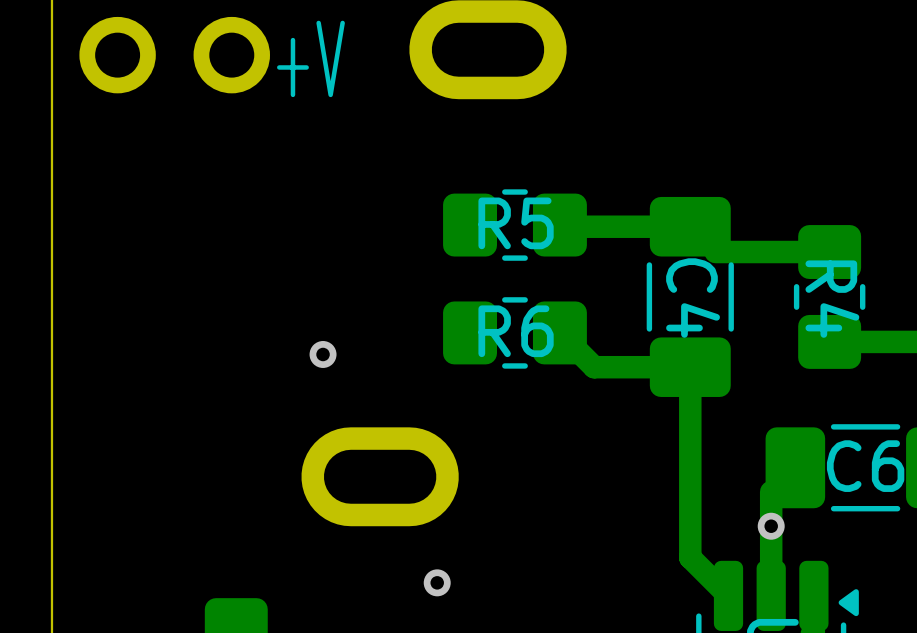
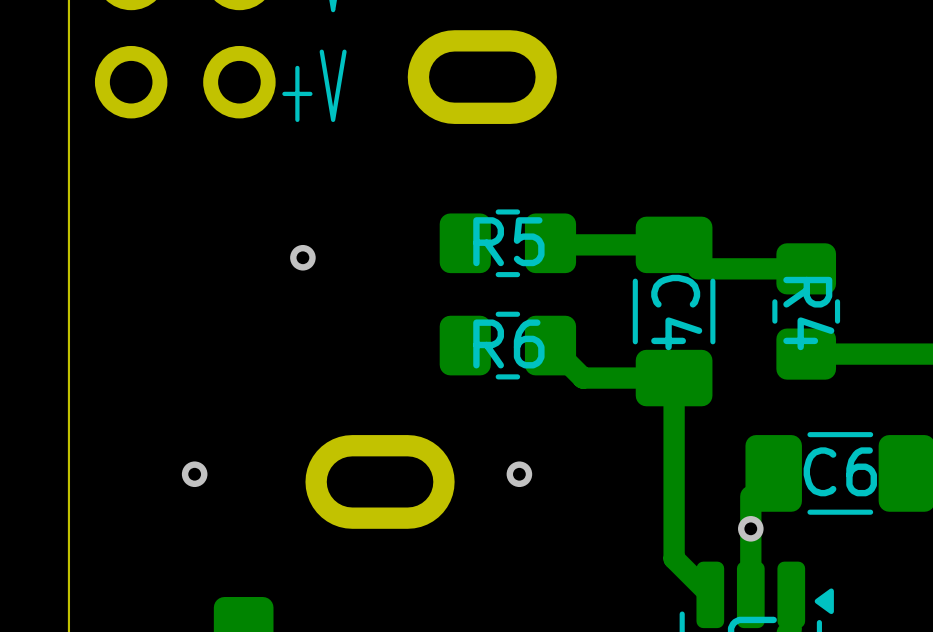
via: none -> (302, 257)
via: (323, 354) -> none
via: none -> (194, 474)
via: none -> (519, 474)
via: (437, 582) -> none

